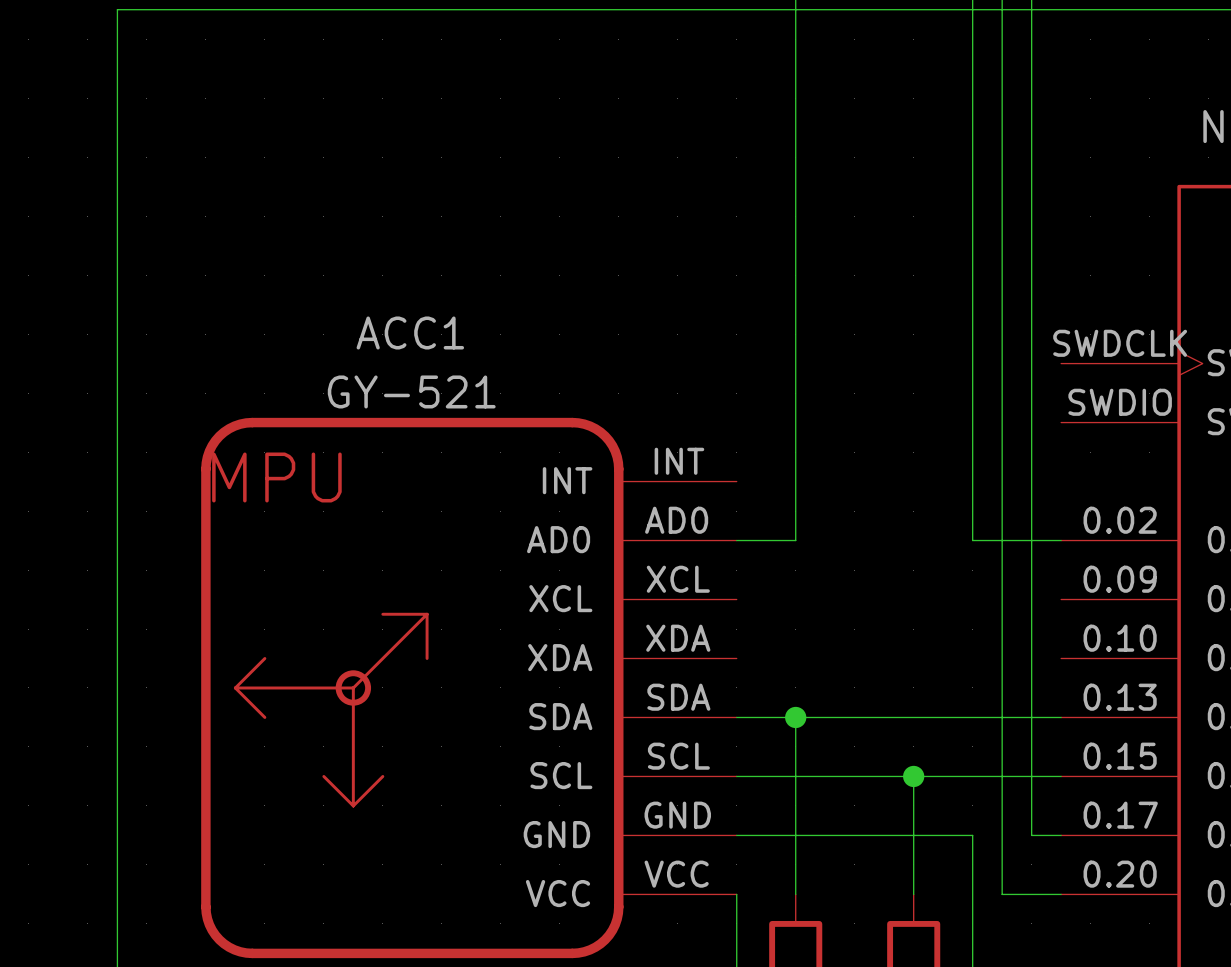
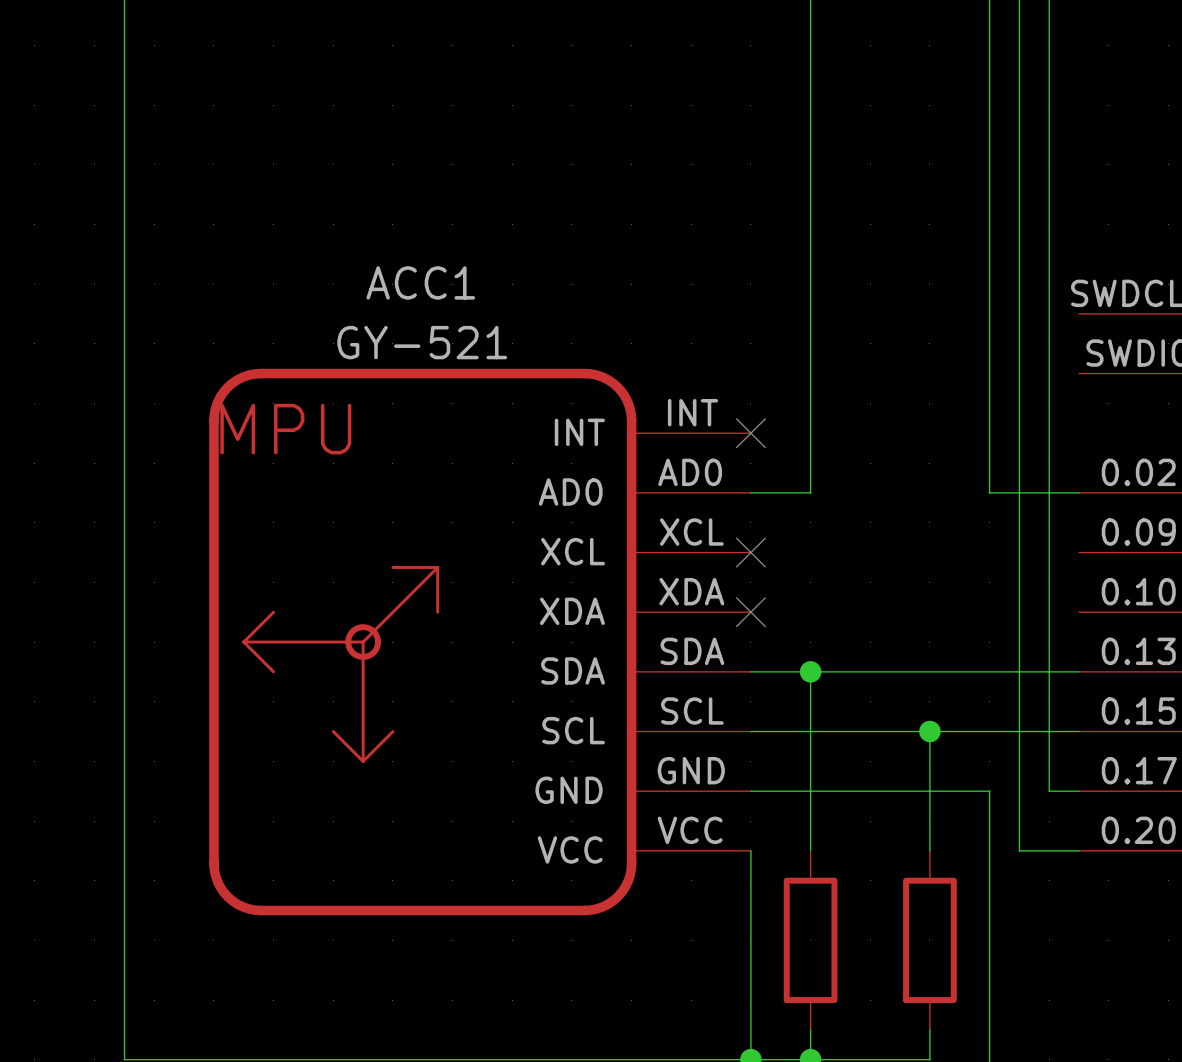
no-connect mark: none -> (750, 433)
no-connect mark: none -> (750, 552)
no-connect mark: none -> (750, 612)

